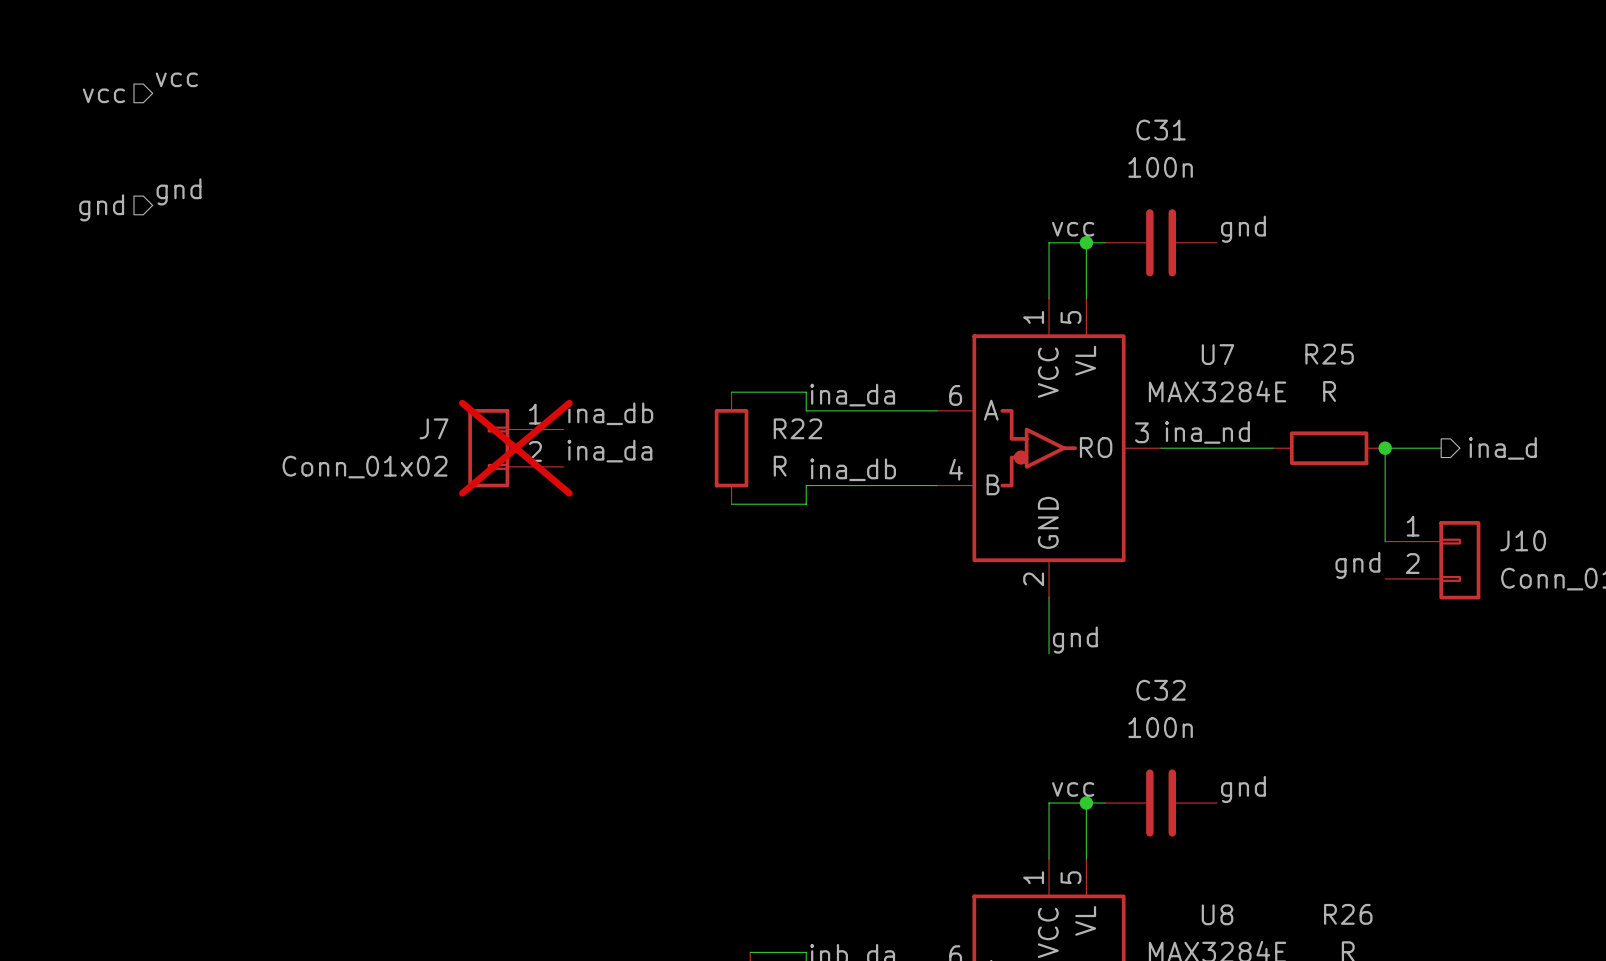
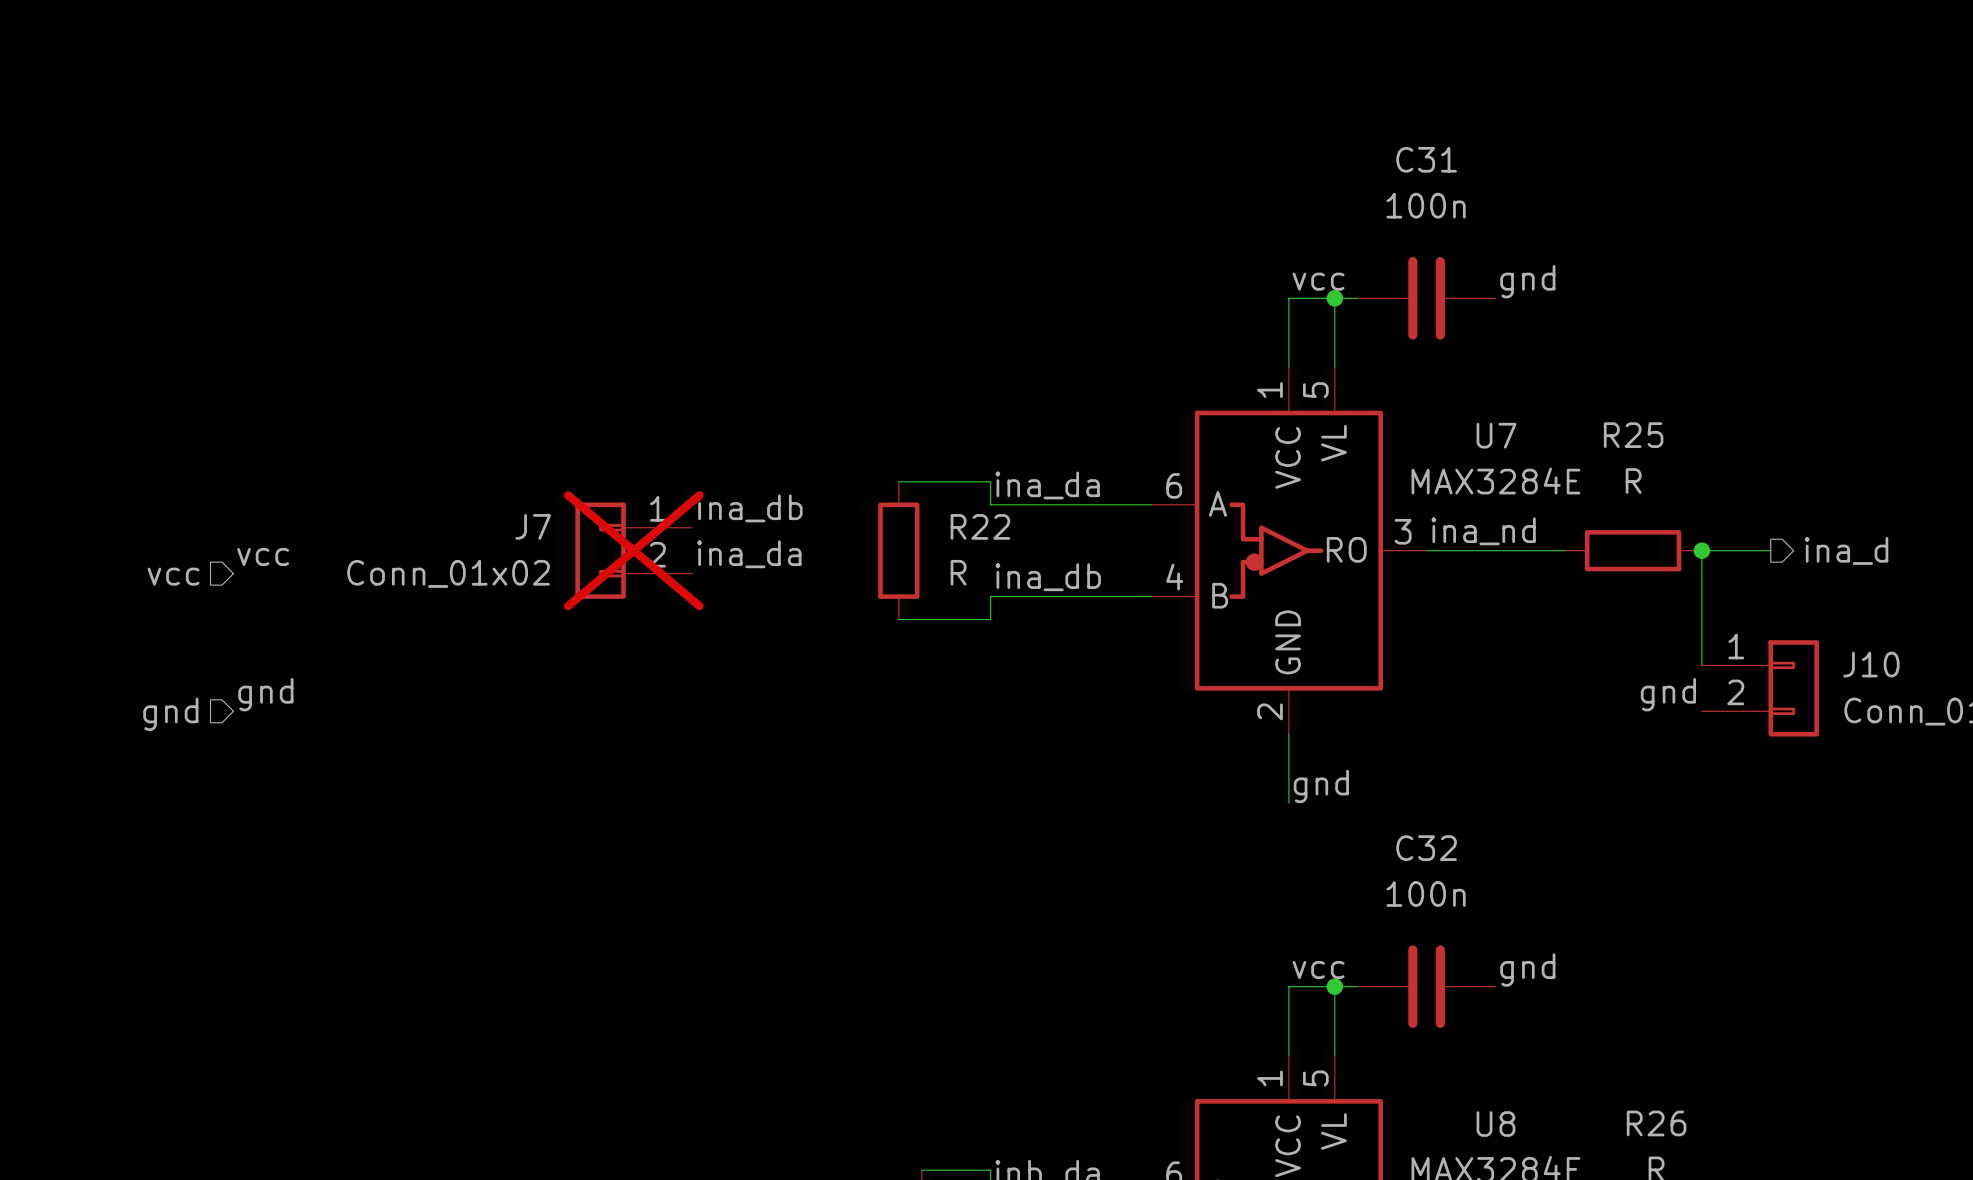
label: vcc (176, 79) -> none
hierarchical label: vcc (103, 95) -> none
label: gnd (179, 191) -> none
hierarchical label: gnd (101, 207) -> none
label: none -> vcc (263, 556)
hierarchical label: none -> vcc (173, 576)
label: none -> gnd (265, 694)
hierarchical label: none -> gnd (170, 714)

